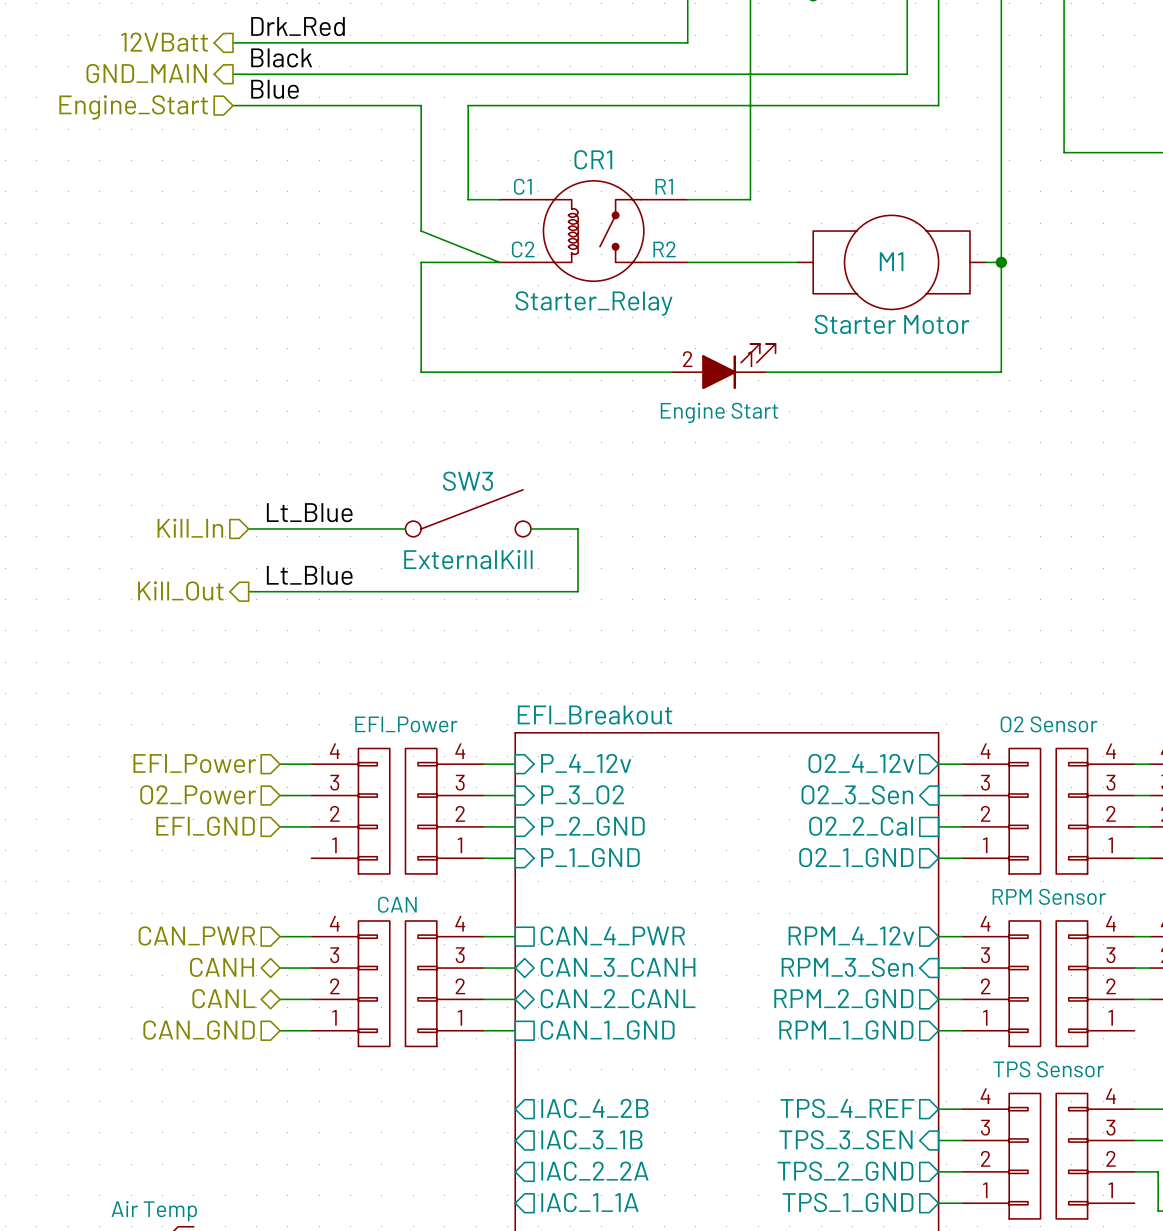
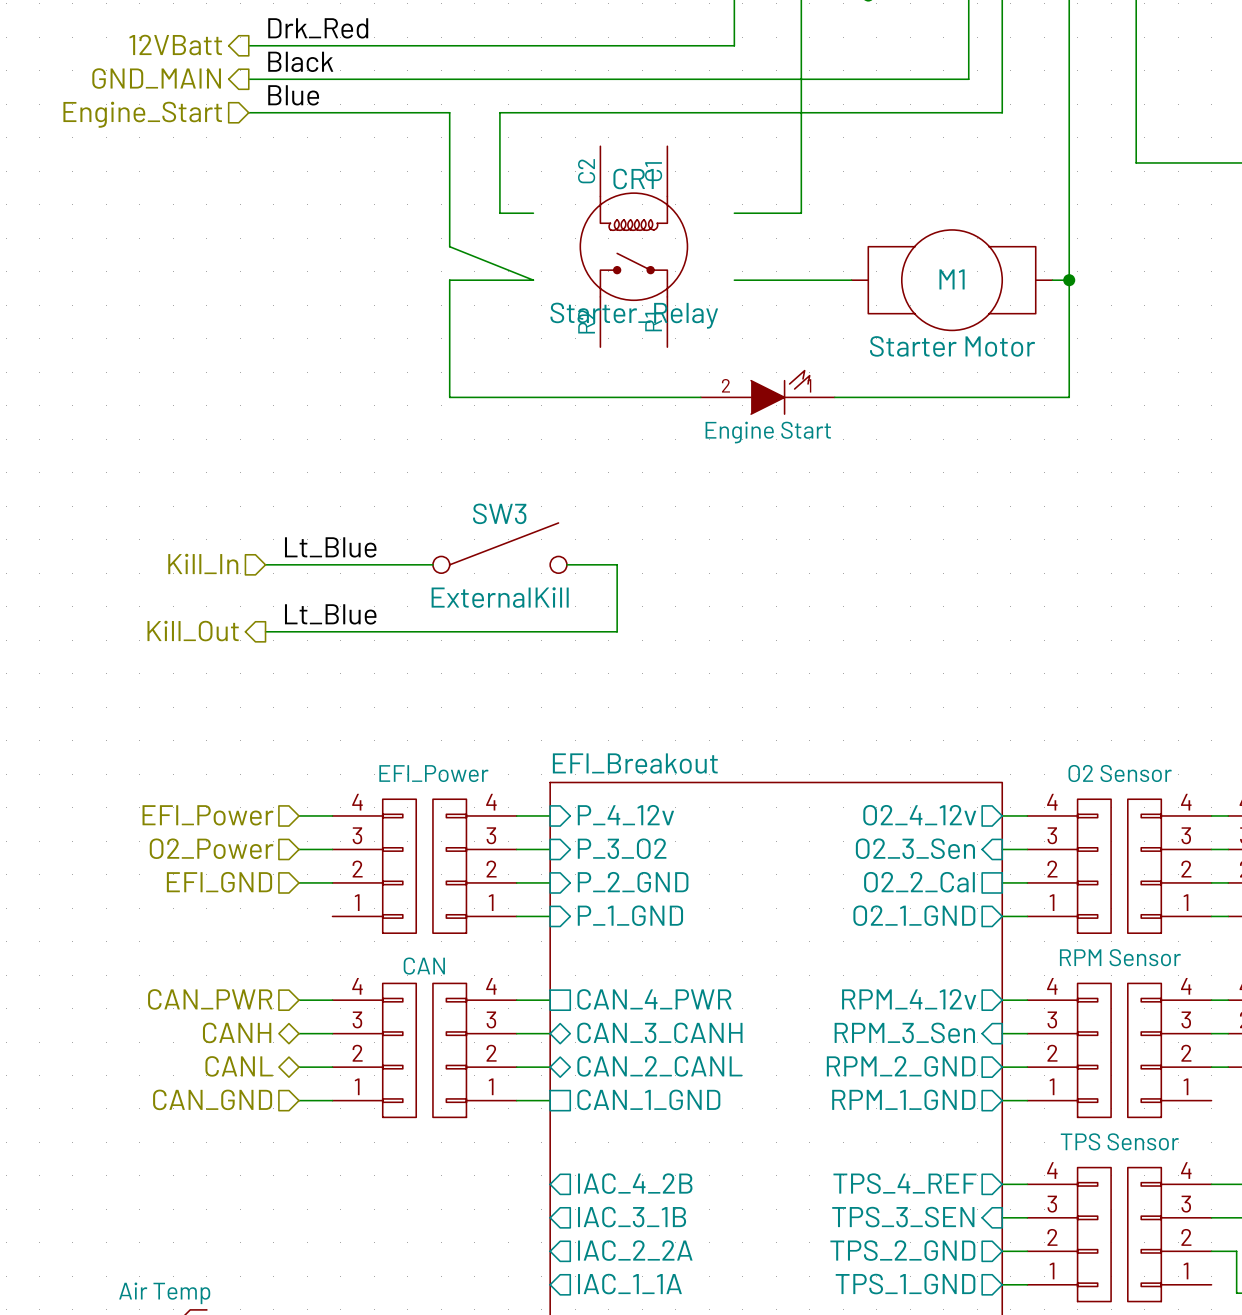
CR1 rotation: 0° (593, 231) -> 90° clockwise (633, 246)
part symbol: [672, 343, 776, 390] -> [700, 370, 835, 415]

